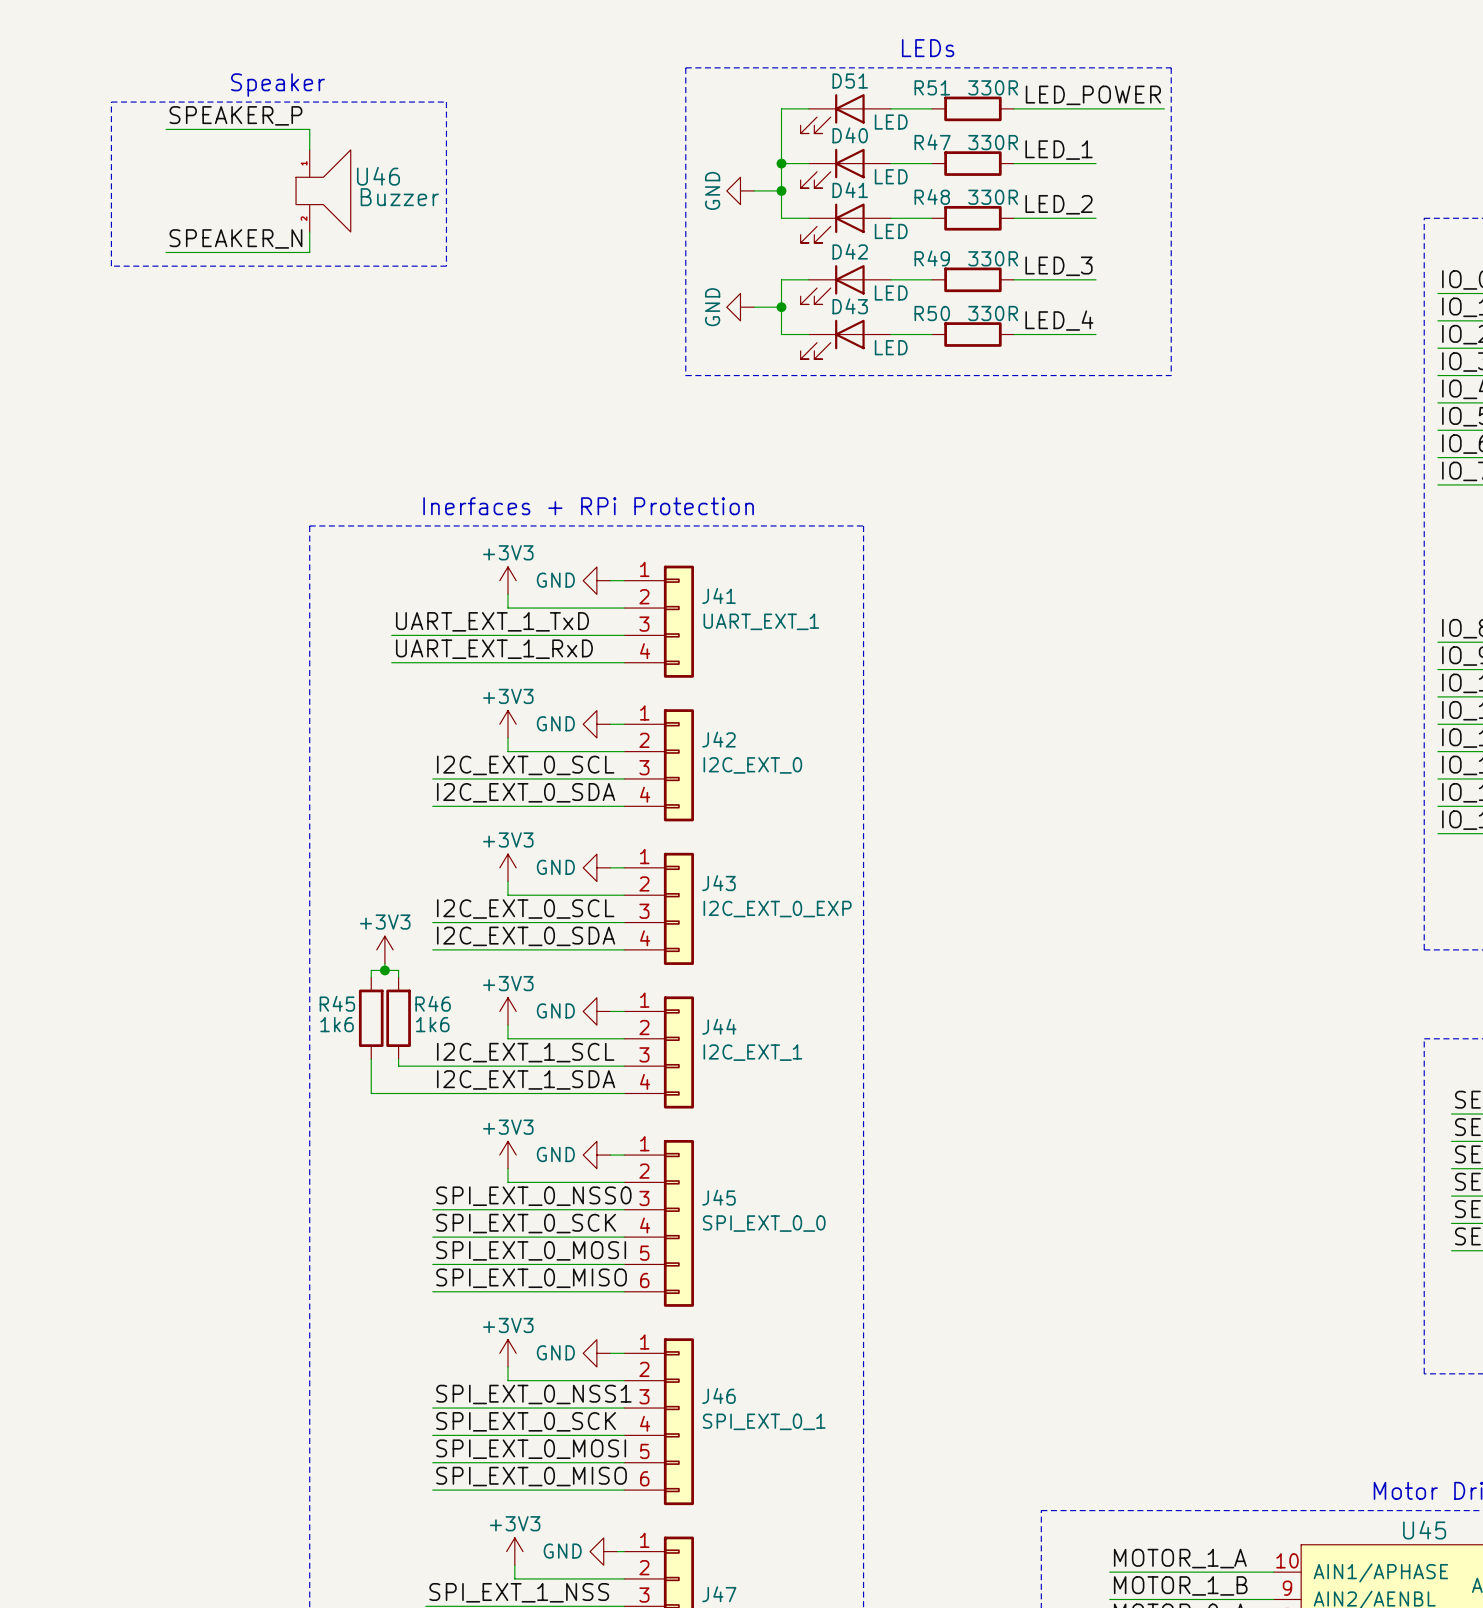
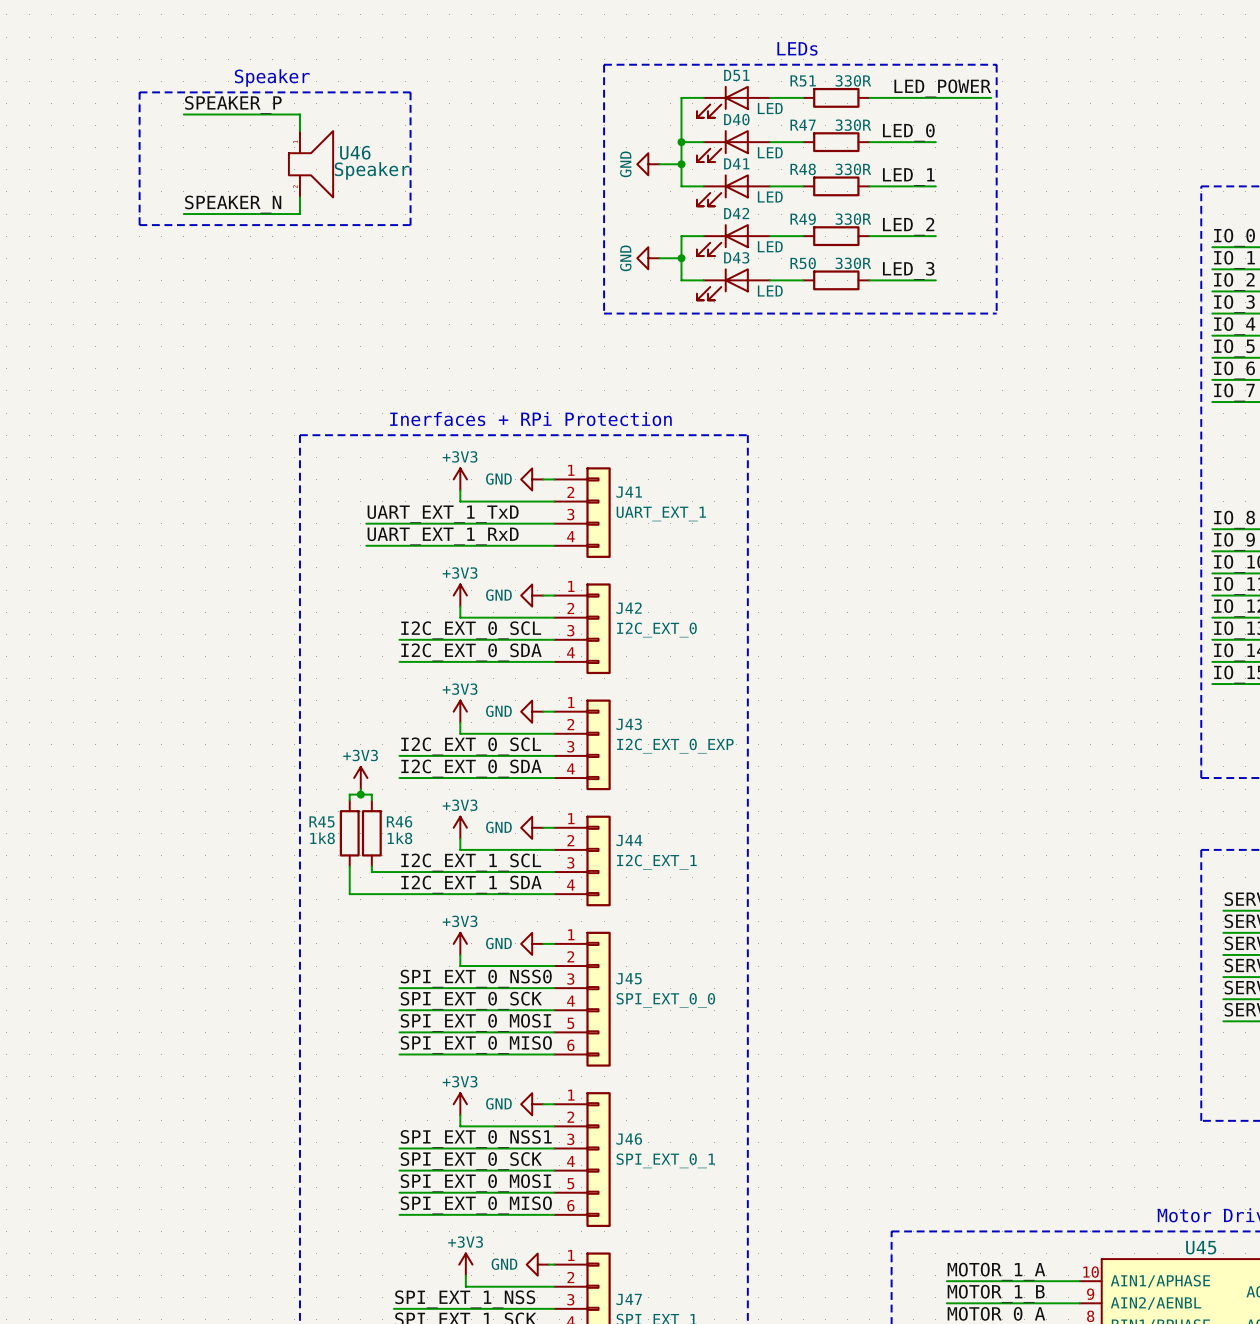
label: LED_1 (1059, 150) -> LED_0 (908, 132)
U46 value: Buzzer (399, 197) -> Speaker (372, 170)
label: LED_2 (1059, 204) -> LED_1 (908, 176)
label: LED_3 (1059, 266) -> LED_2 (908, 226)
label: LED_4 (1059, 320) -> LED_3 (908, 270)
R45 value: 1k6 (337, 1024) -> 1k8 (322, 838)
R46 value: 1k6 (432, 1024) -> 1k8 (399, 838)

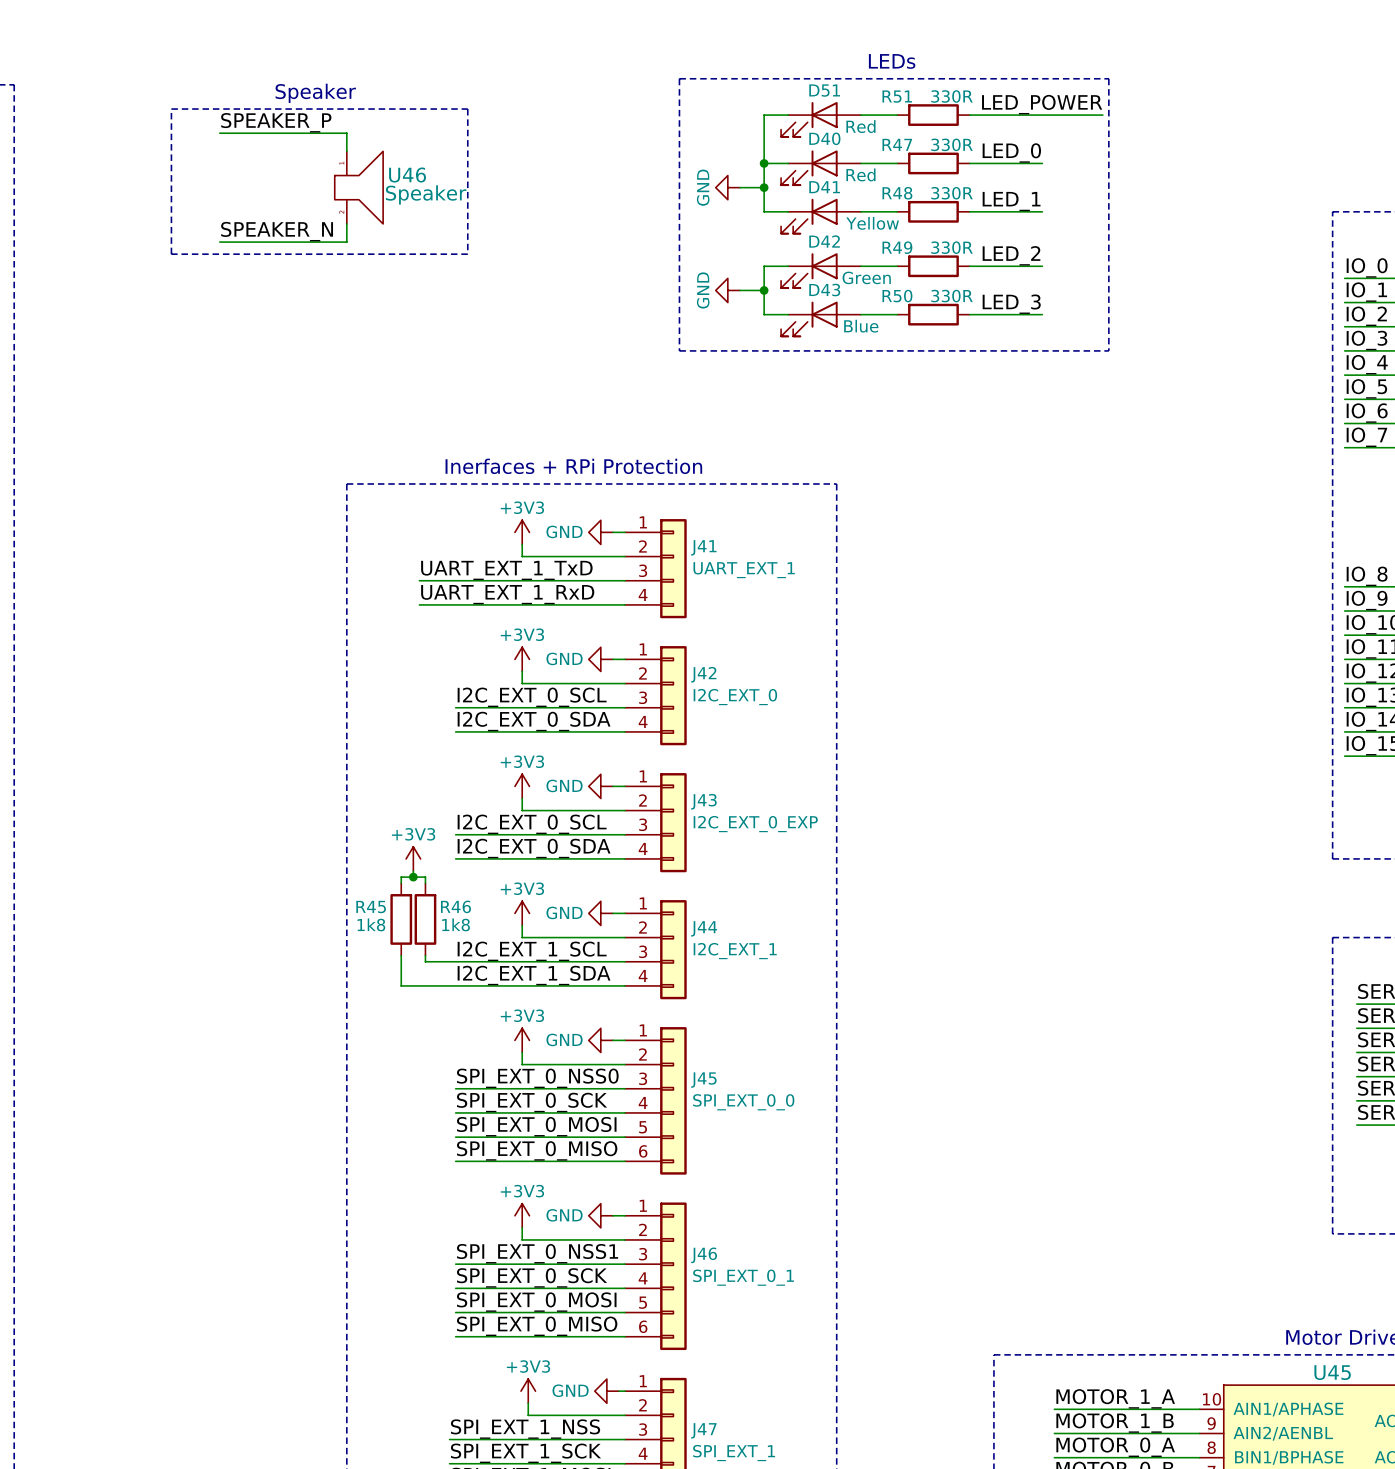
D51 value: LED (770, 108) -> Red (860, 126)
D40 value: LED (770, 152) -> Red (860, 174)
D41 value: LED (770, 197) -> Yellow (872, 223)
D42 value: LED (770, 246) -> Green (866, 277)
D43 value: LED (770, 291) -> Blue (861, 326)

